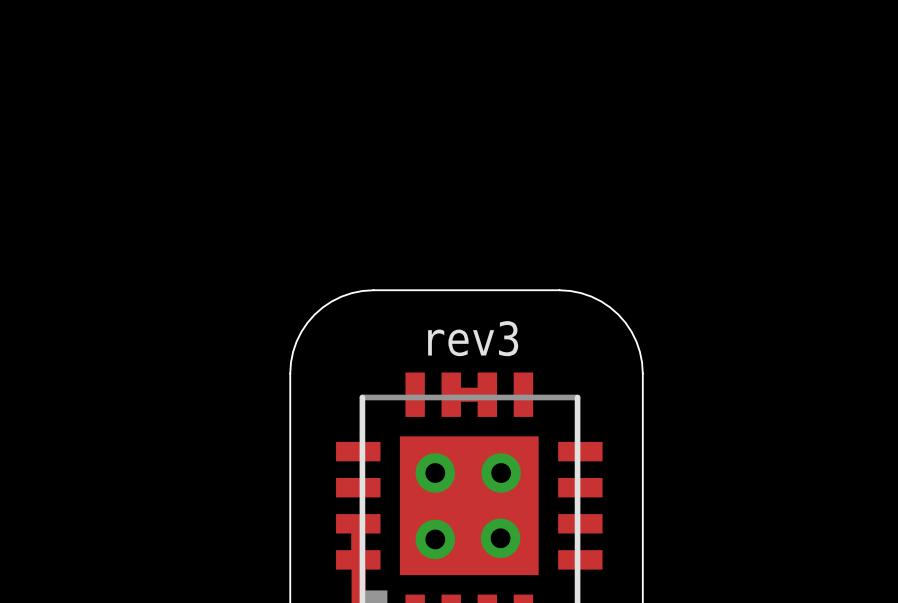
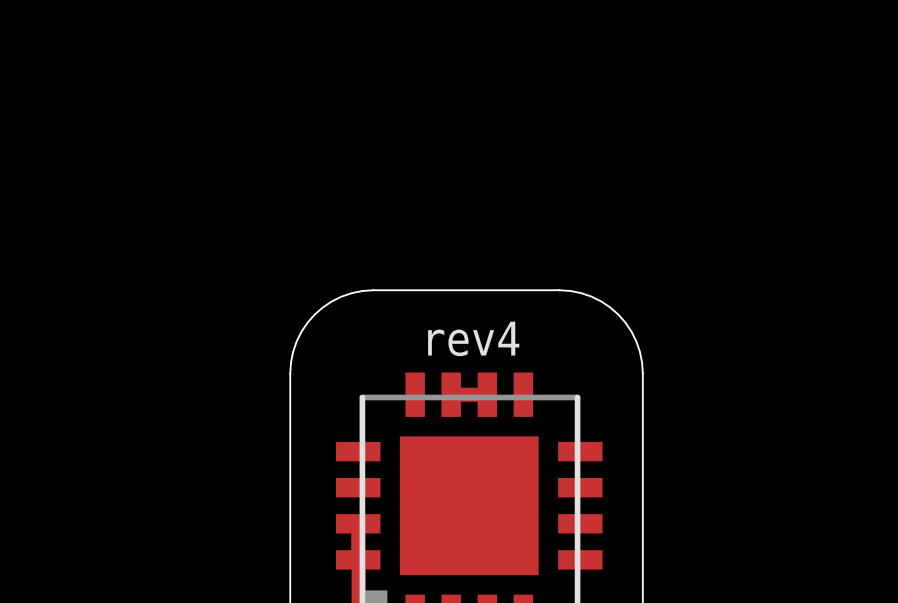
text: rev3 (473, 338) -> rev4 (473, 338)
via: (435, 473) -> none
via: (501, 473) -> none
via: (500, 538) -> none
via: (435, 539) -> none

